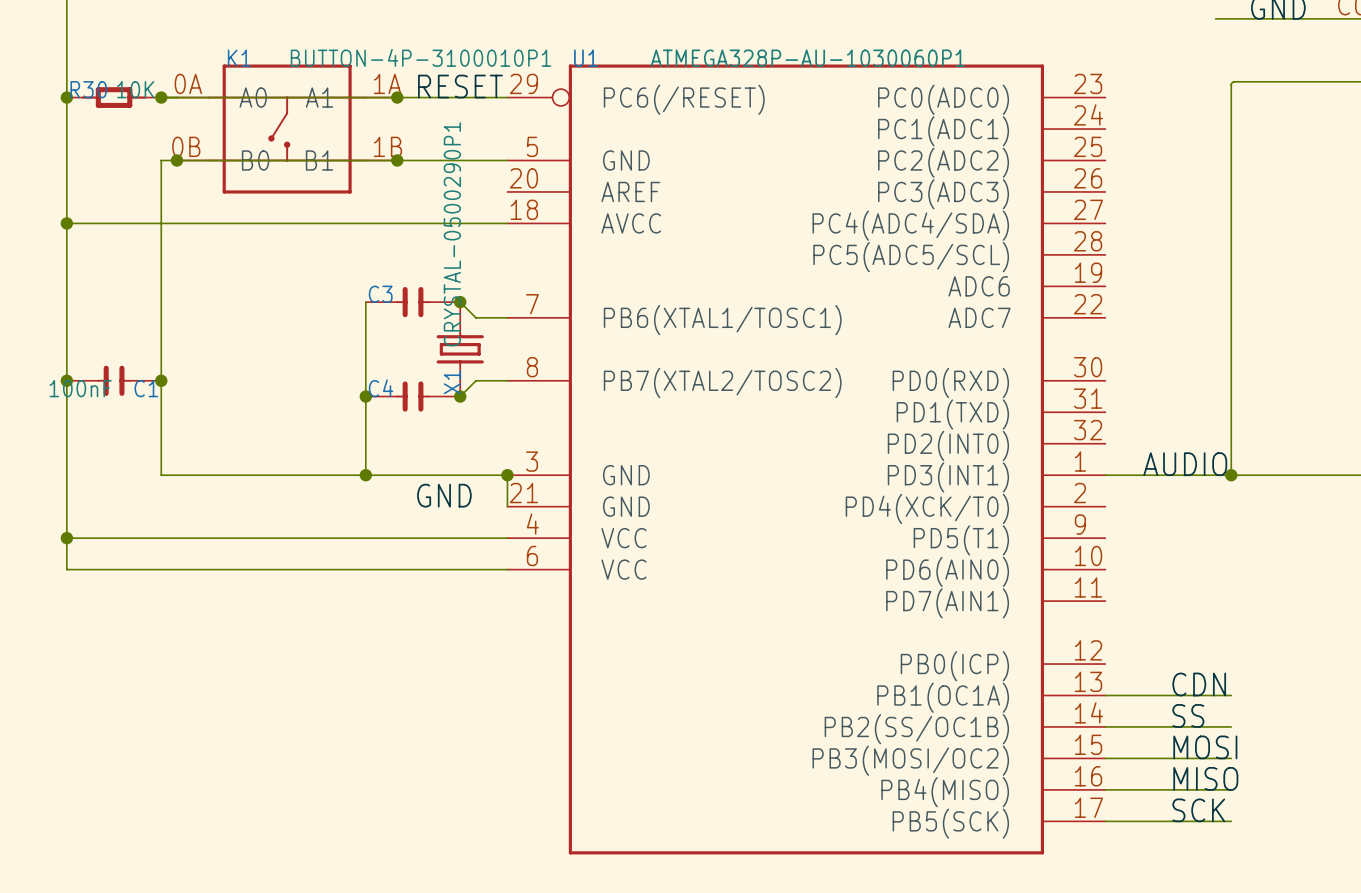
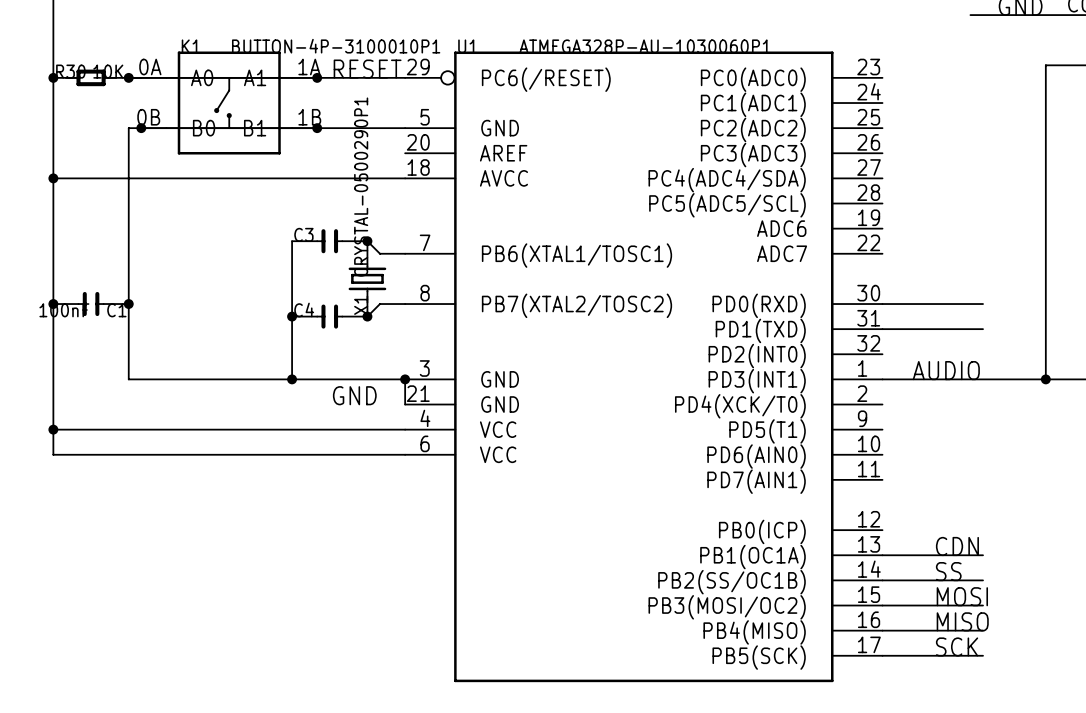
wire: (1309, 81) (1234, 81) (1231, 84) (1231, 475) -> (1045, 65) (1045, 379)
wire: none -> (882, 304) (983, 304)
wire: none -> (882, 329) (983, 329)
junction: (1231, 475) -> none
junction: none -> (1045, 379)

